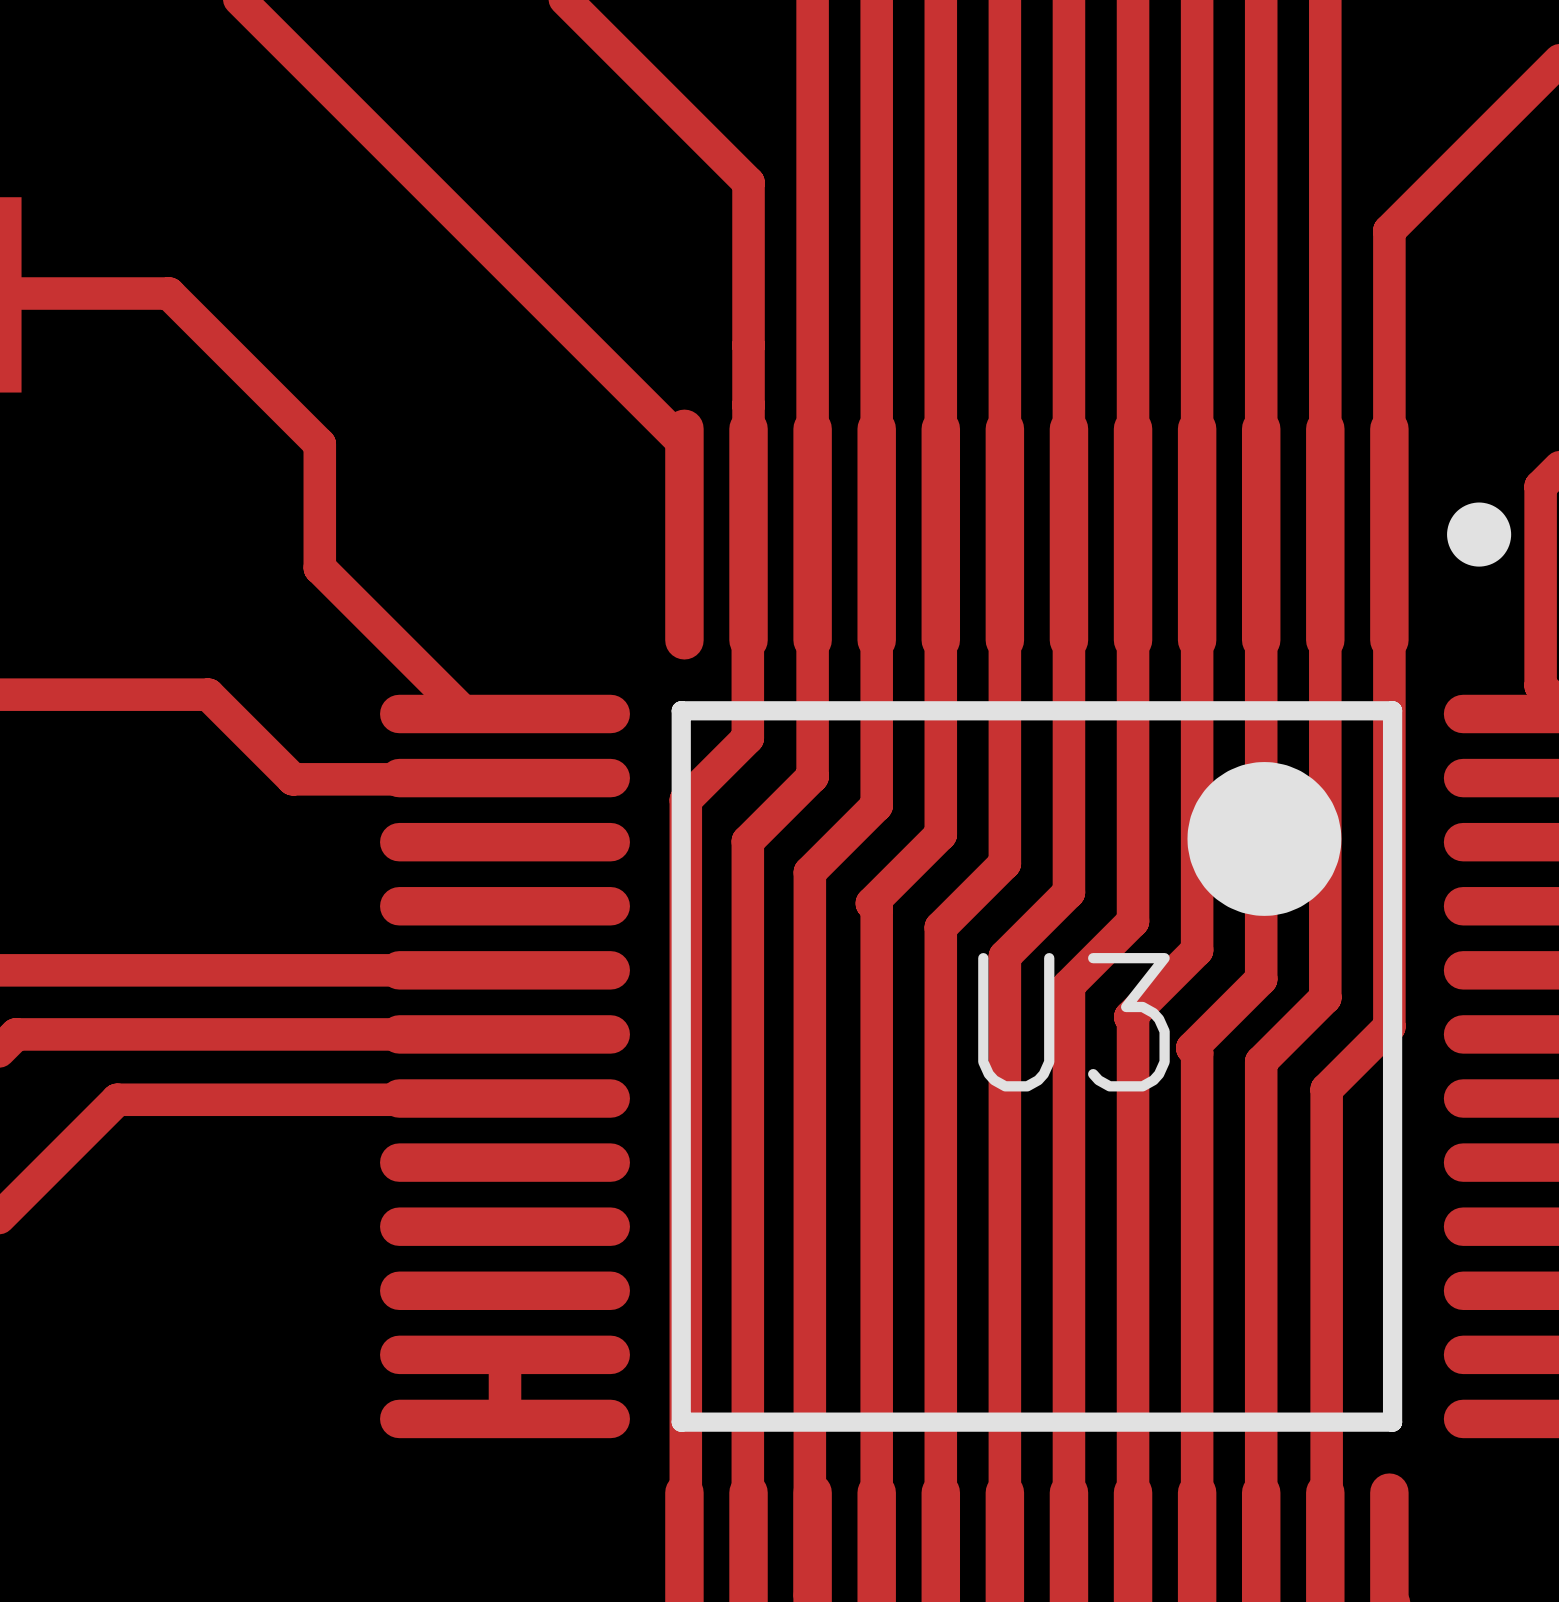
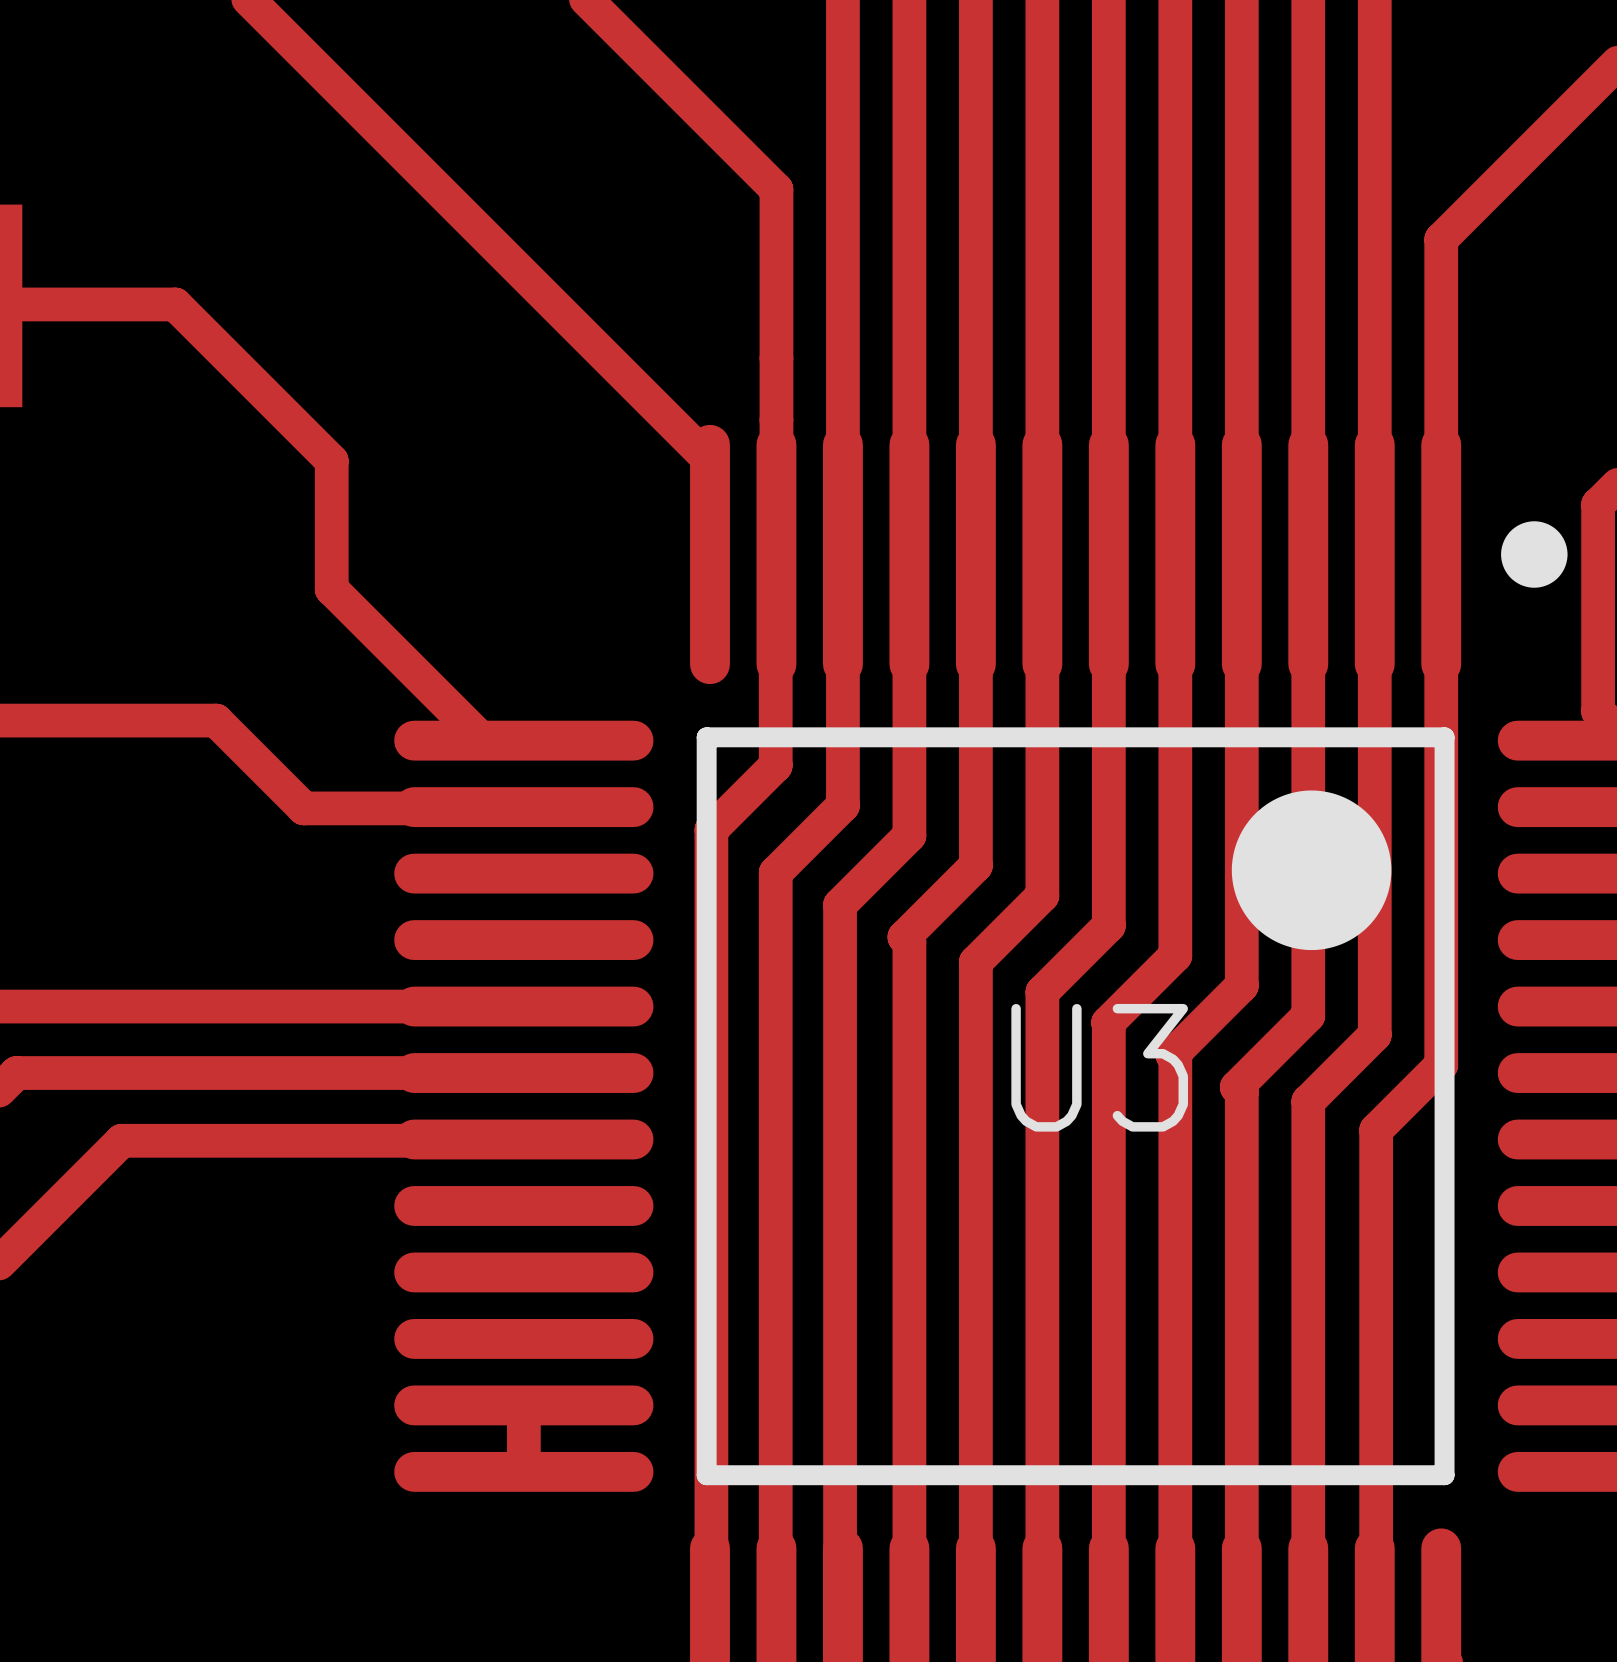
U3 name position: U3 (1073, 1022) -> U3 (1099, 1067)

